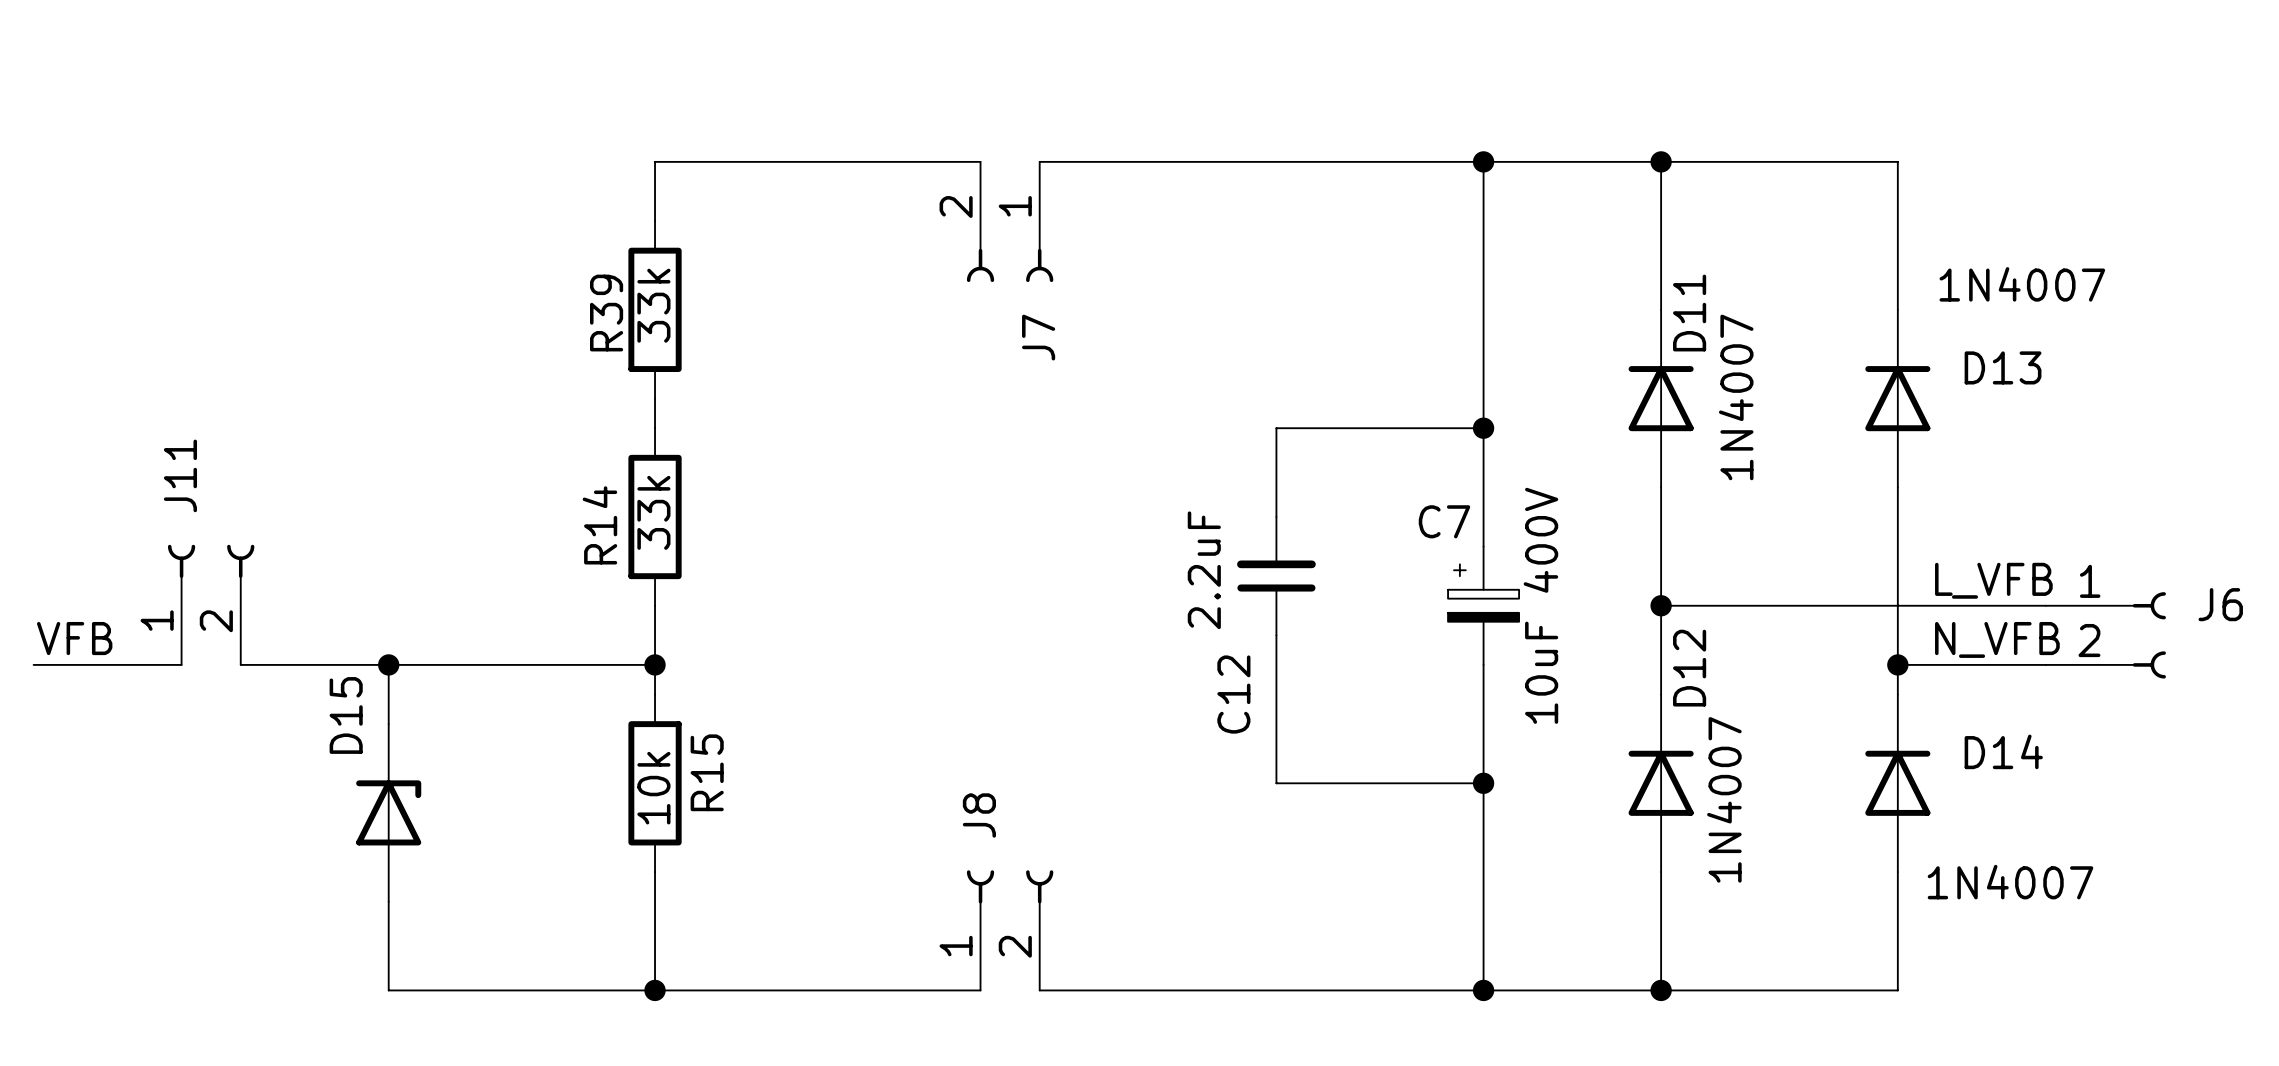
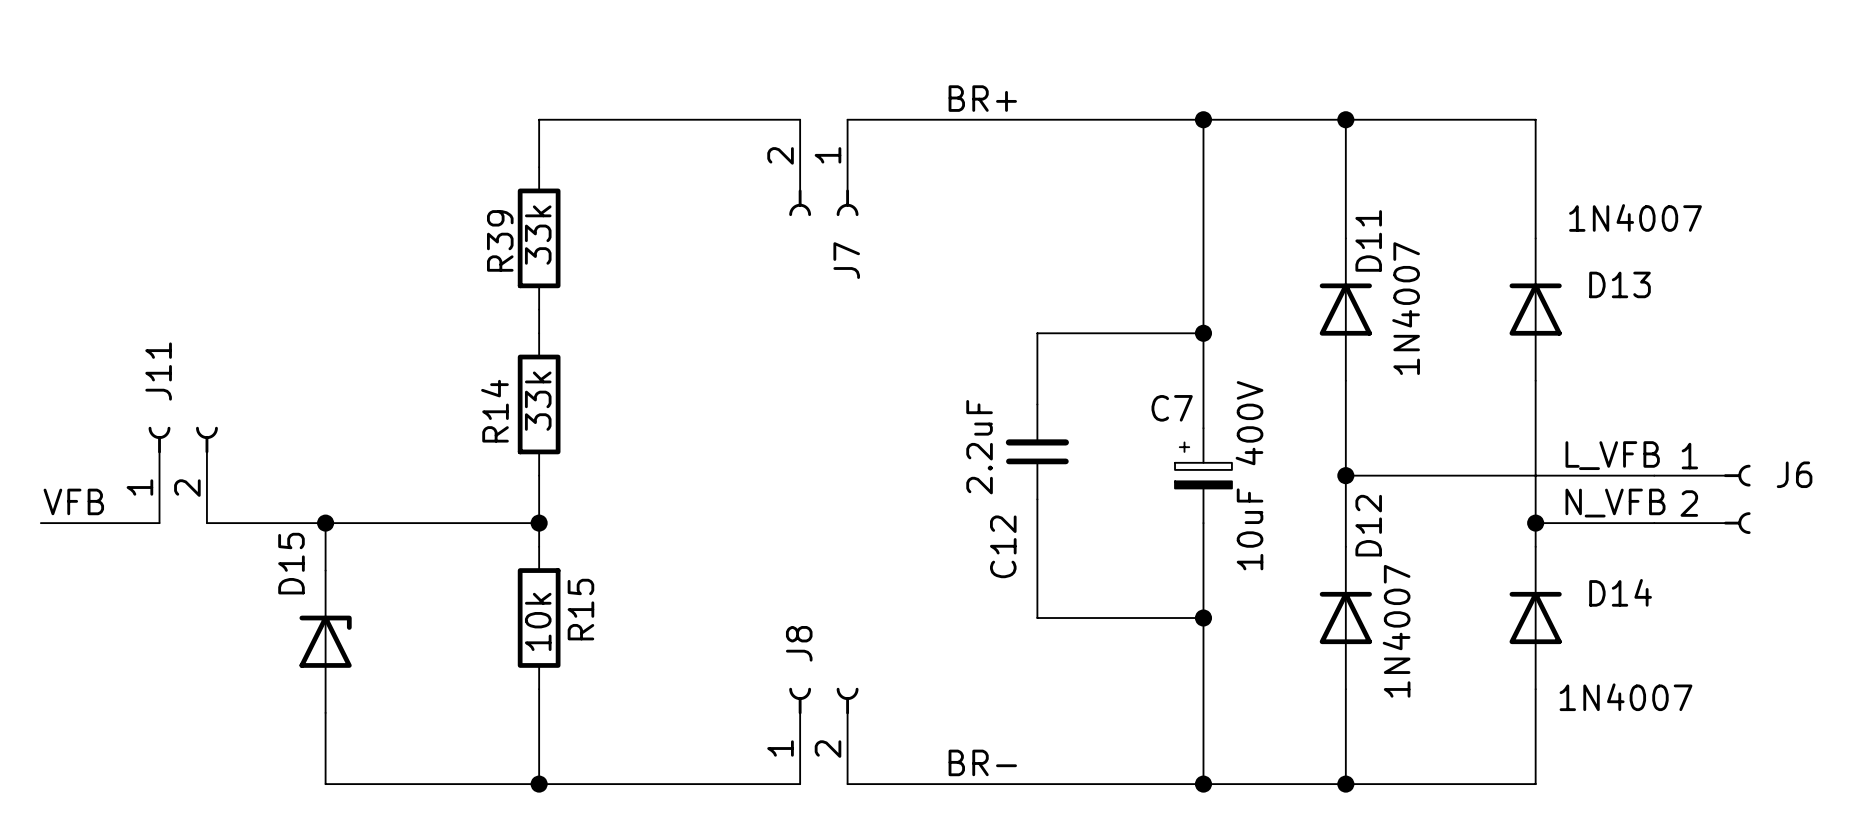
label: none -> BR+ (982, 98)
label: none -> BR- (982, 762)

